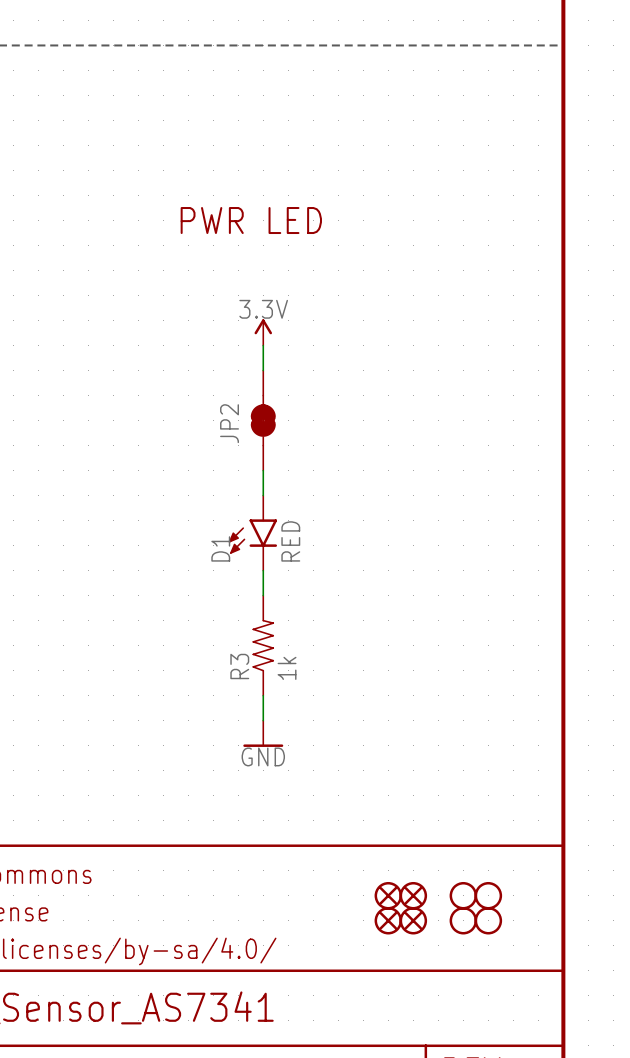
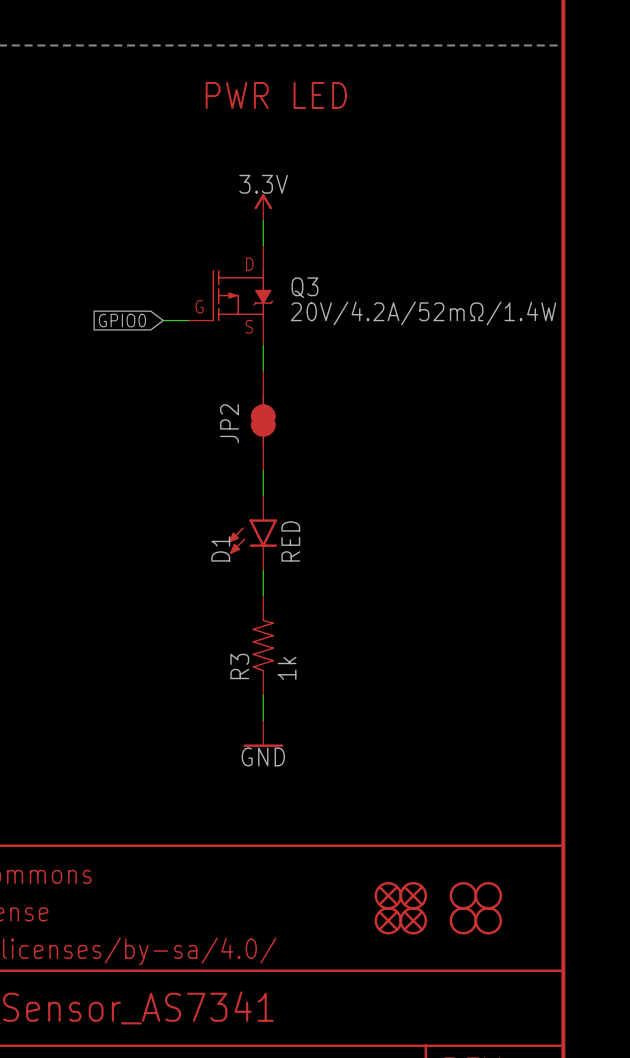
text position: PWR LED (251, 220) -> PWR LED (276, 95)
wire: none -> (263, 220) (263, 245)
Q3: none -> 20V/4.2A/52mΩ/1.4W (230, 295)
global label: none -> GPIO0 (122, 320)
wire: none -> (163, 320) (188, 320)
power symbol position: 3.3V (263, 332) -> 3.3V (263, 207)

